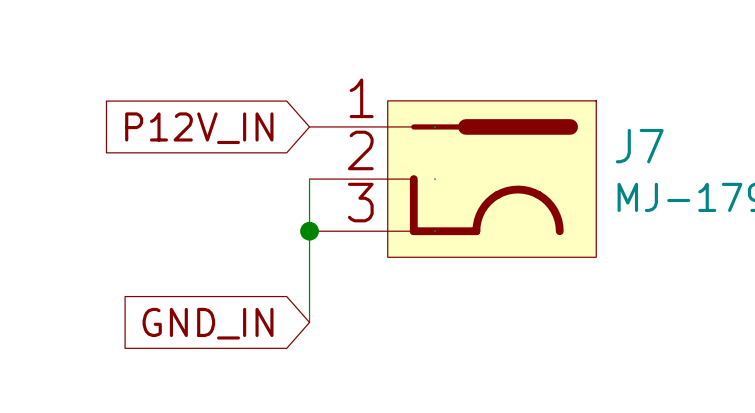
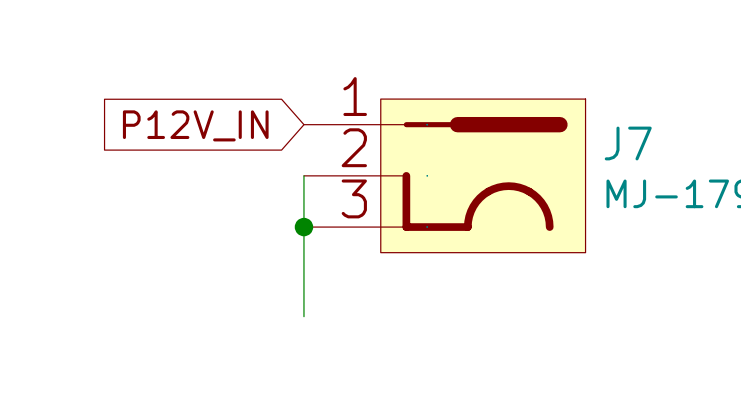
global label: GND_IN (208, 323) -> none

